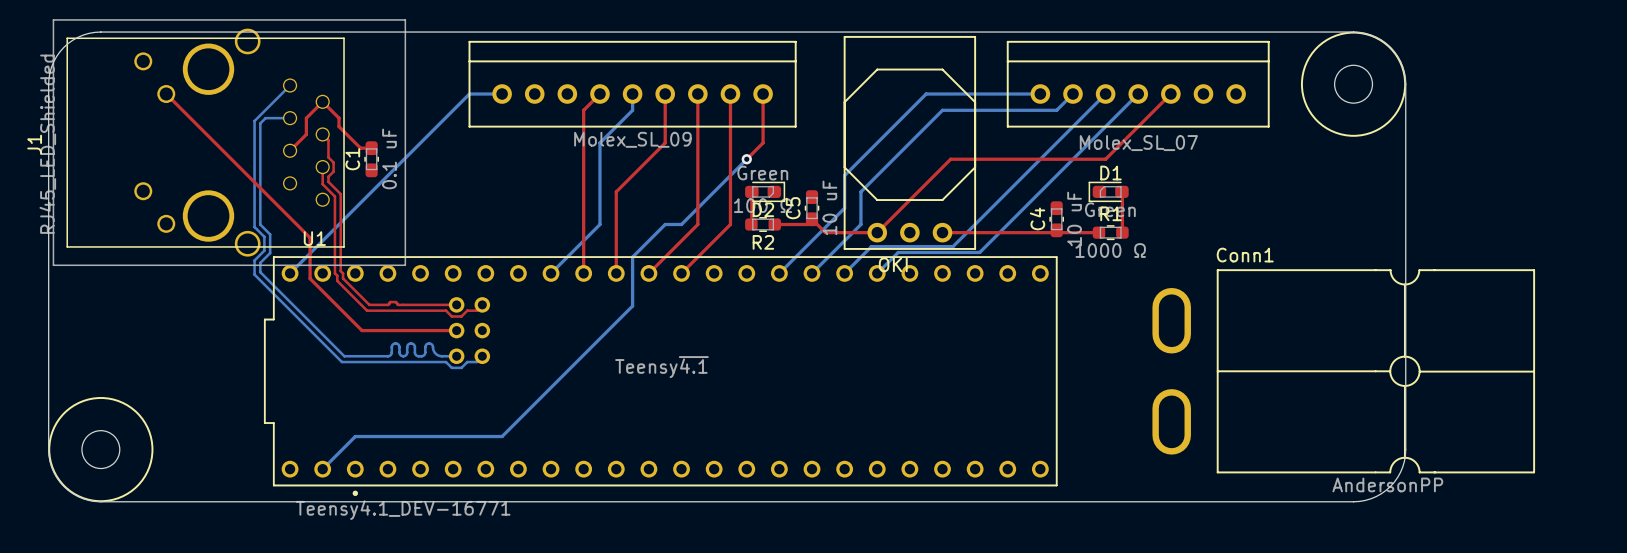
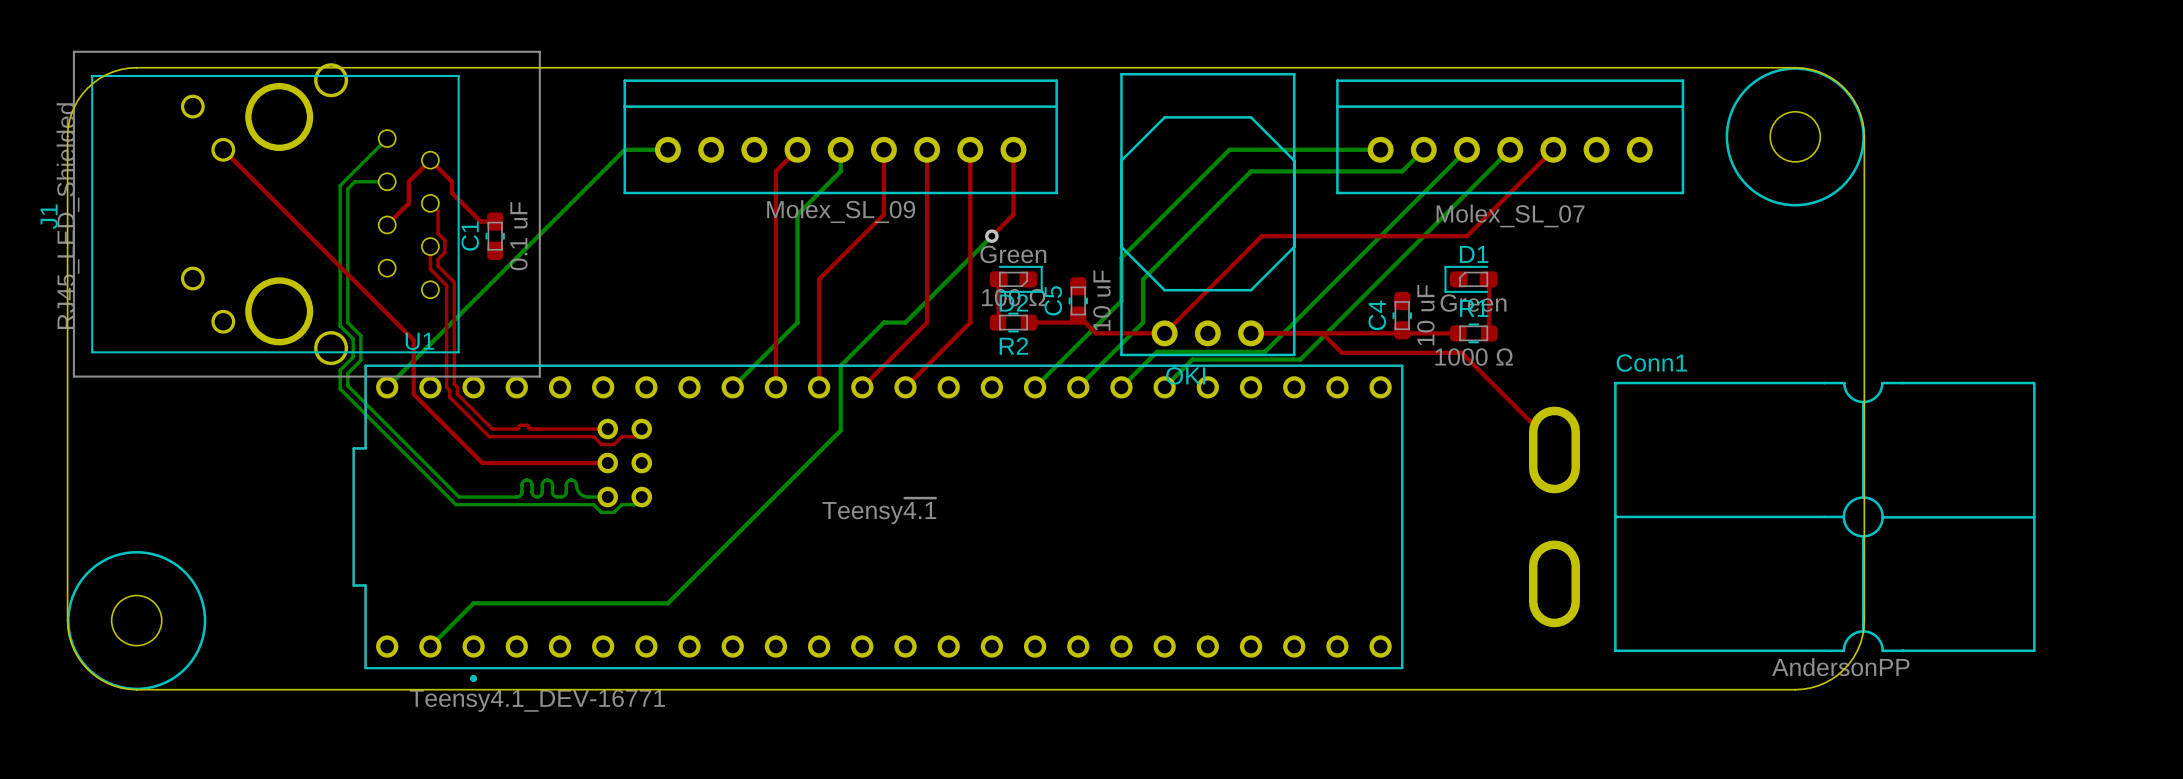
top track: none -> (1251, 333) (1322, 333) (1341, 352) (1461, 352) (1554, 445)

